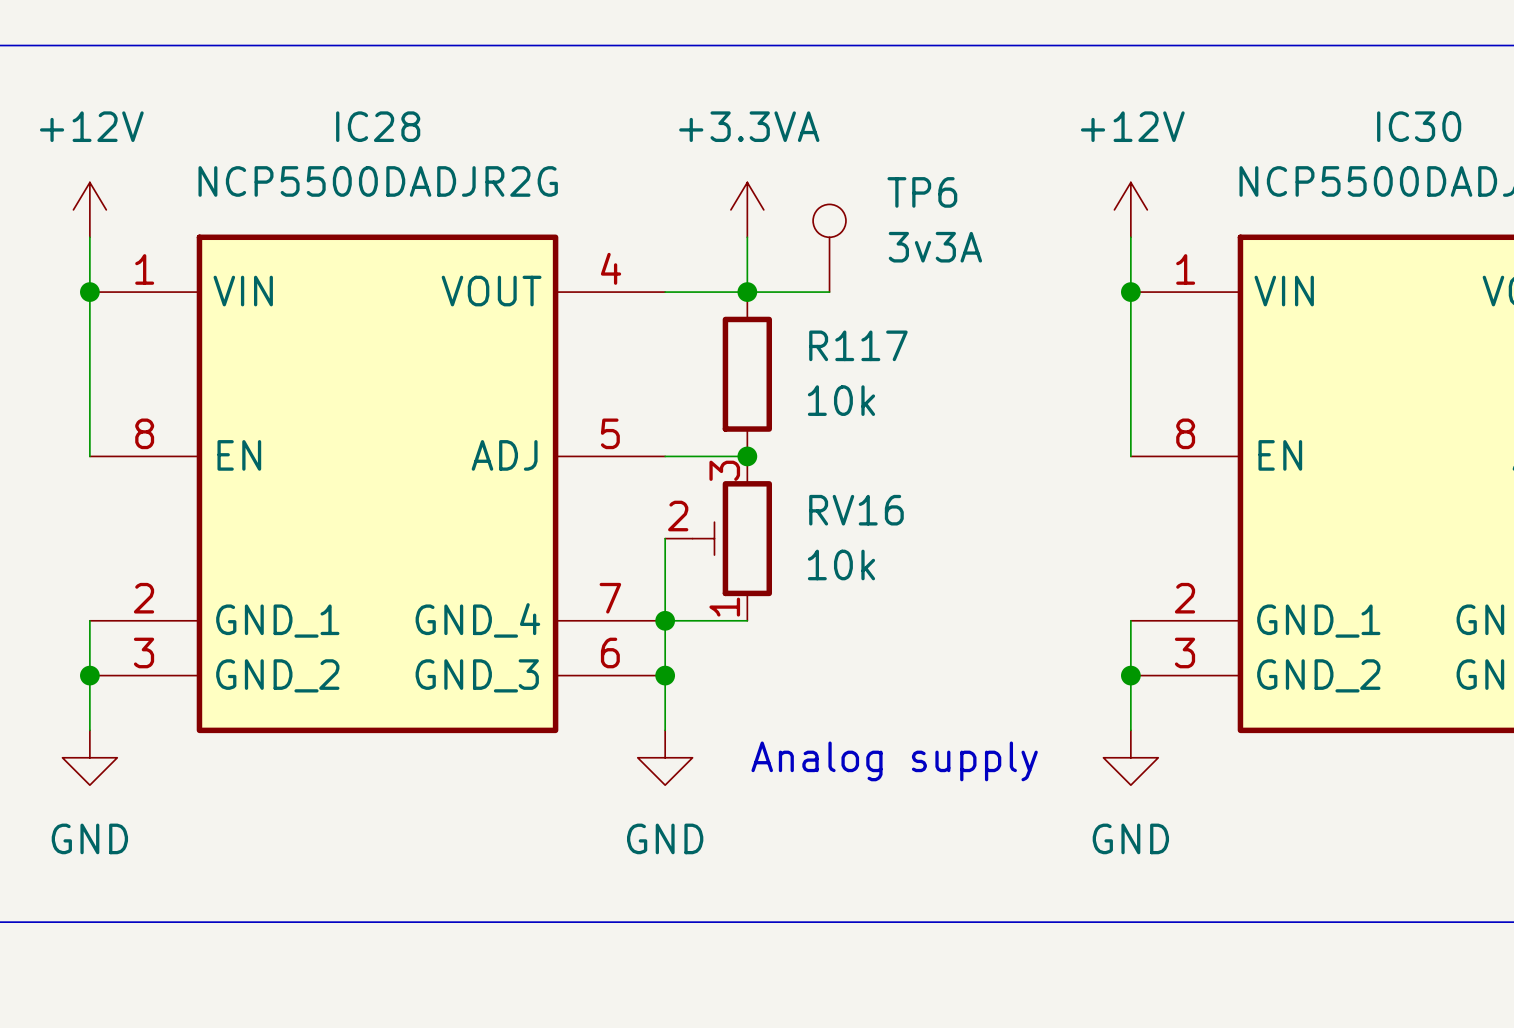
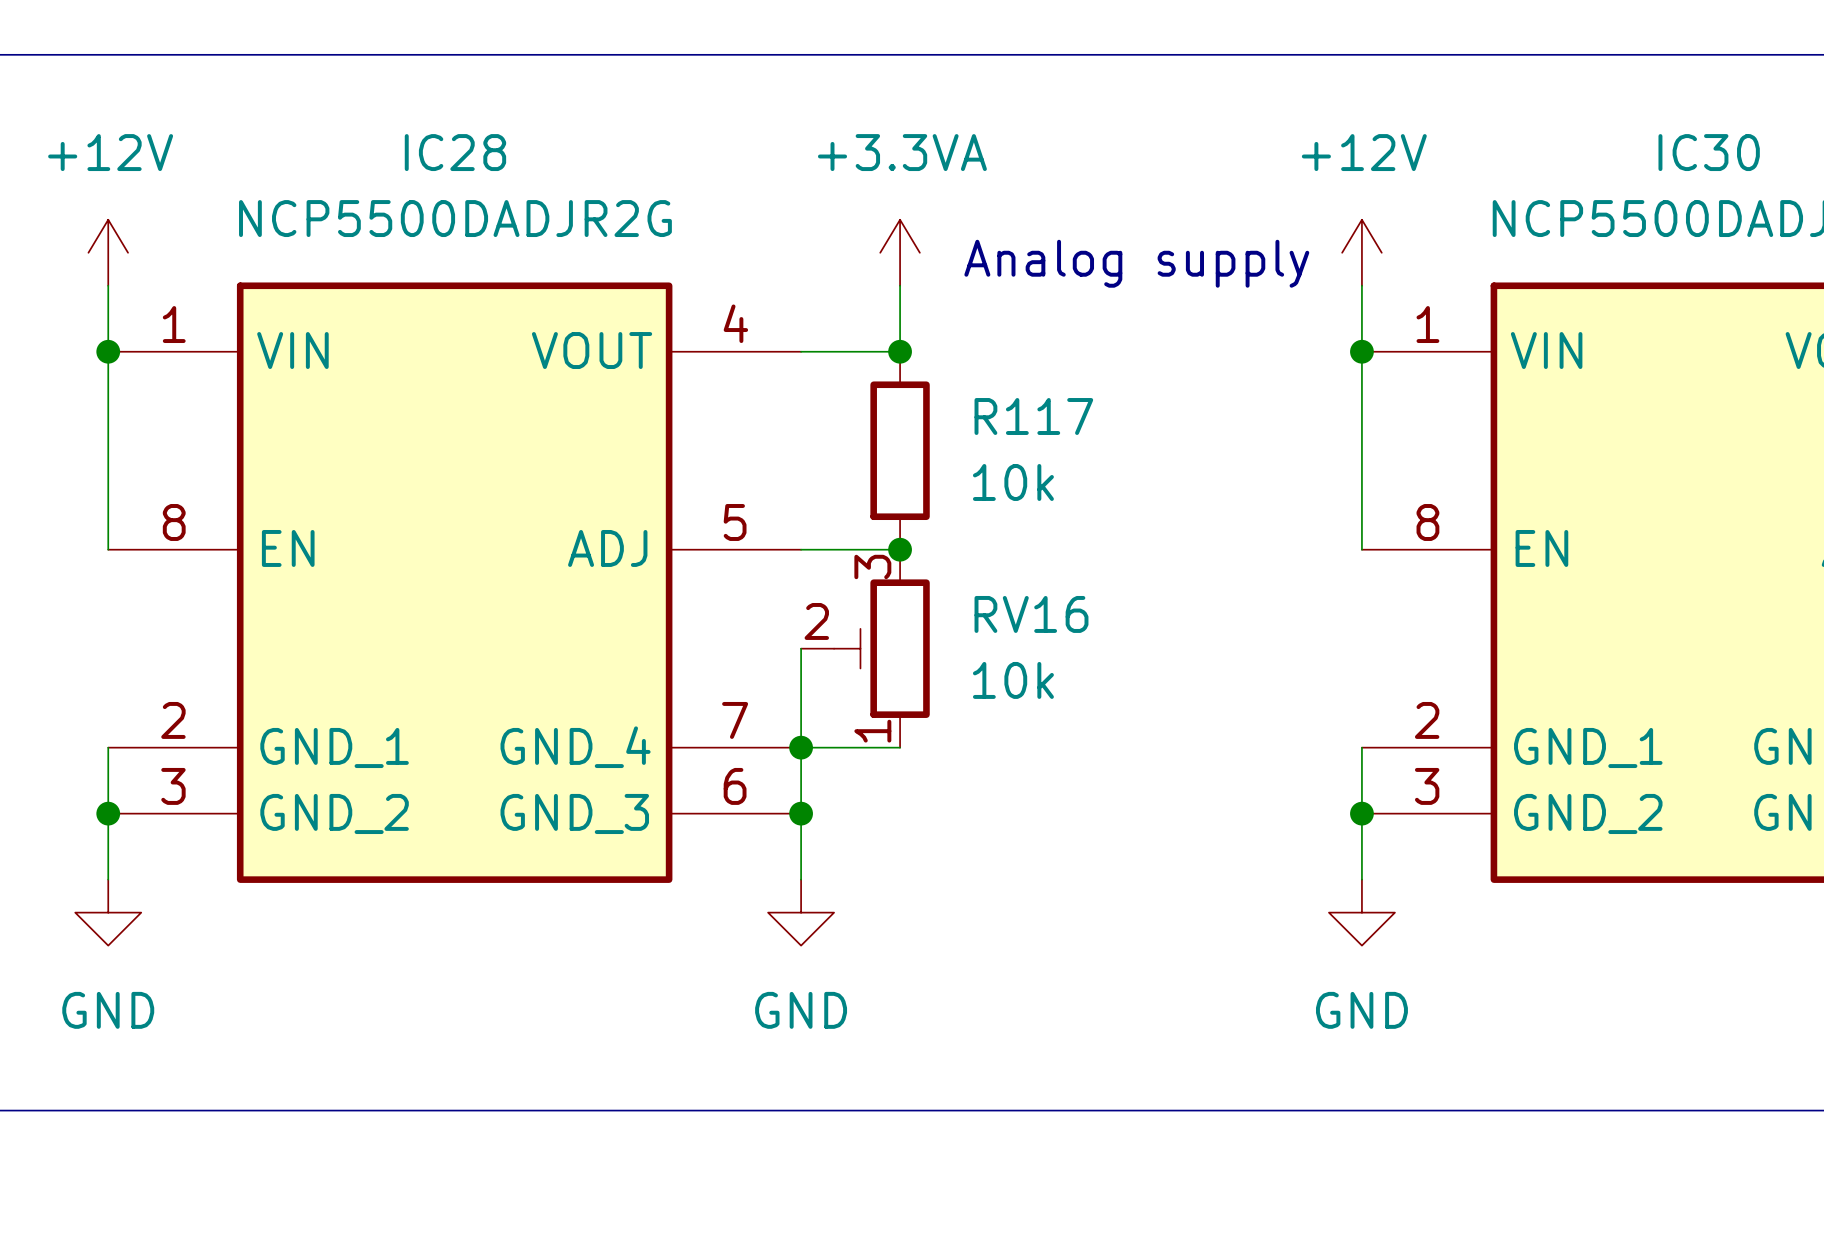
text: none -> Analog supply (1136, 263)
TP6: 3v3A (829, 248) -> none
wire: (747, 292) (829, 292) -> none
text: Analog supply (894, 761) -> none

